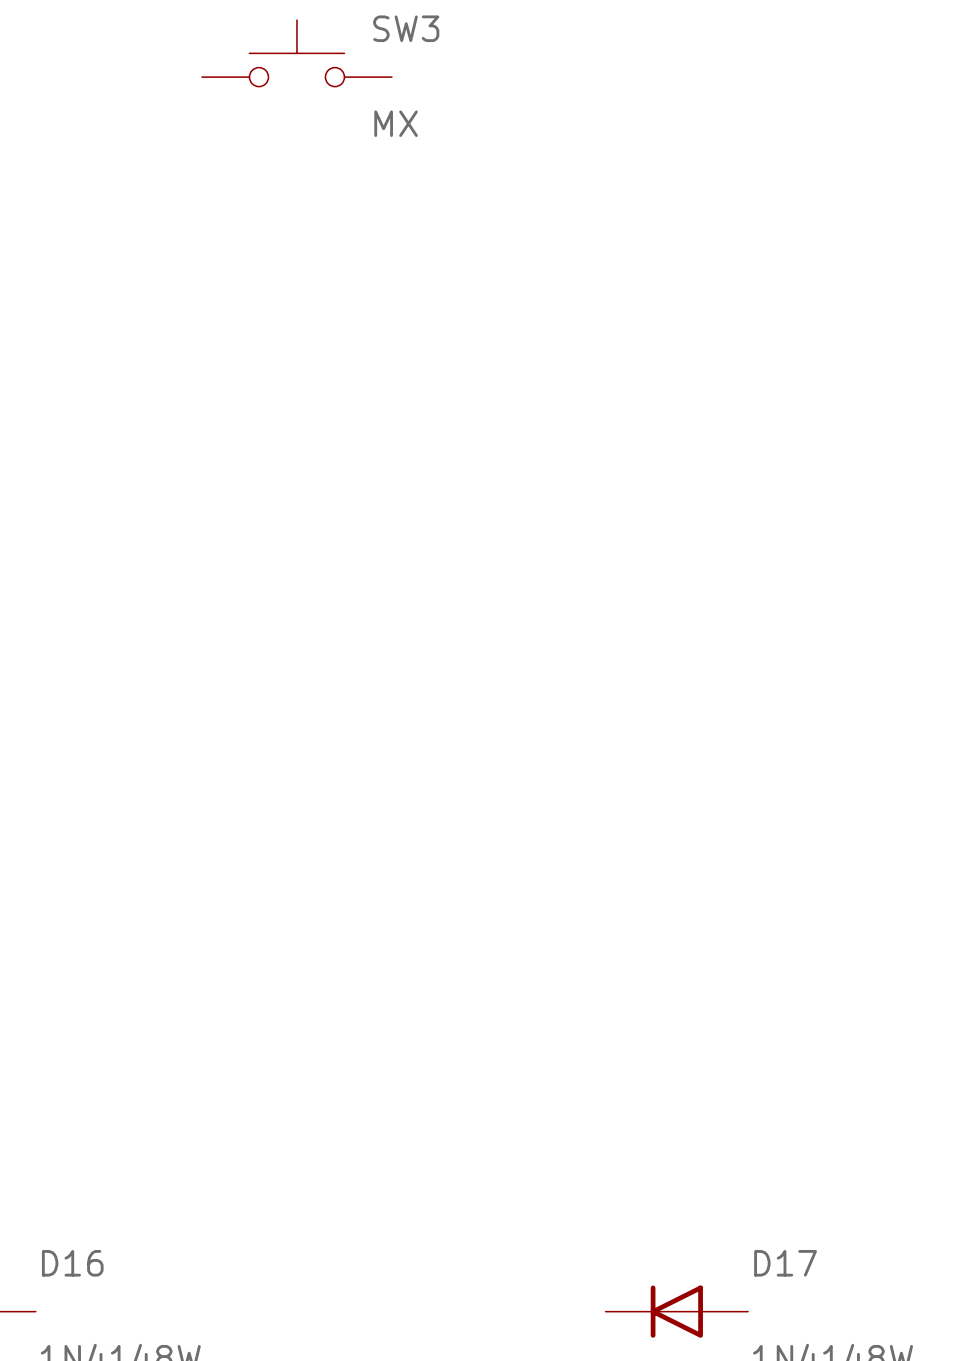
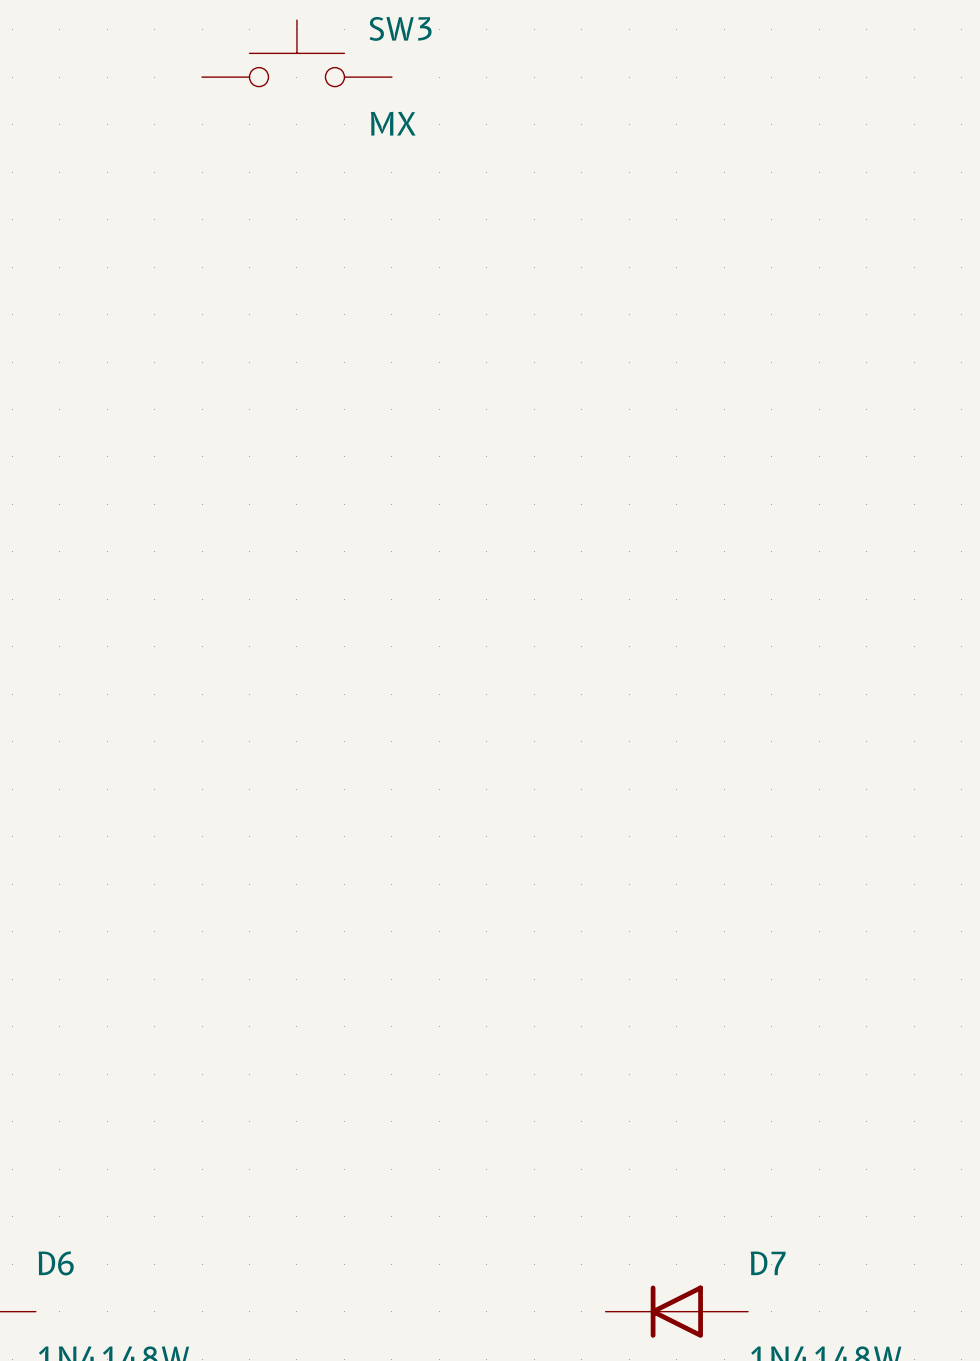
D16 name: D16 (72, 1263) -> D6 (56, 1263)
D17 name: D17 (785, 1263) -> D7 (768, 1263)

